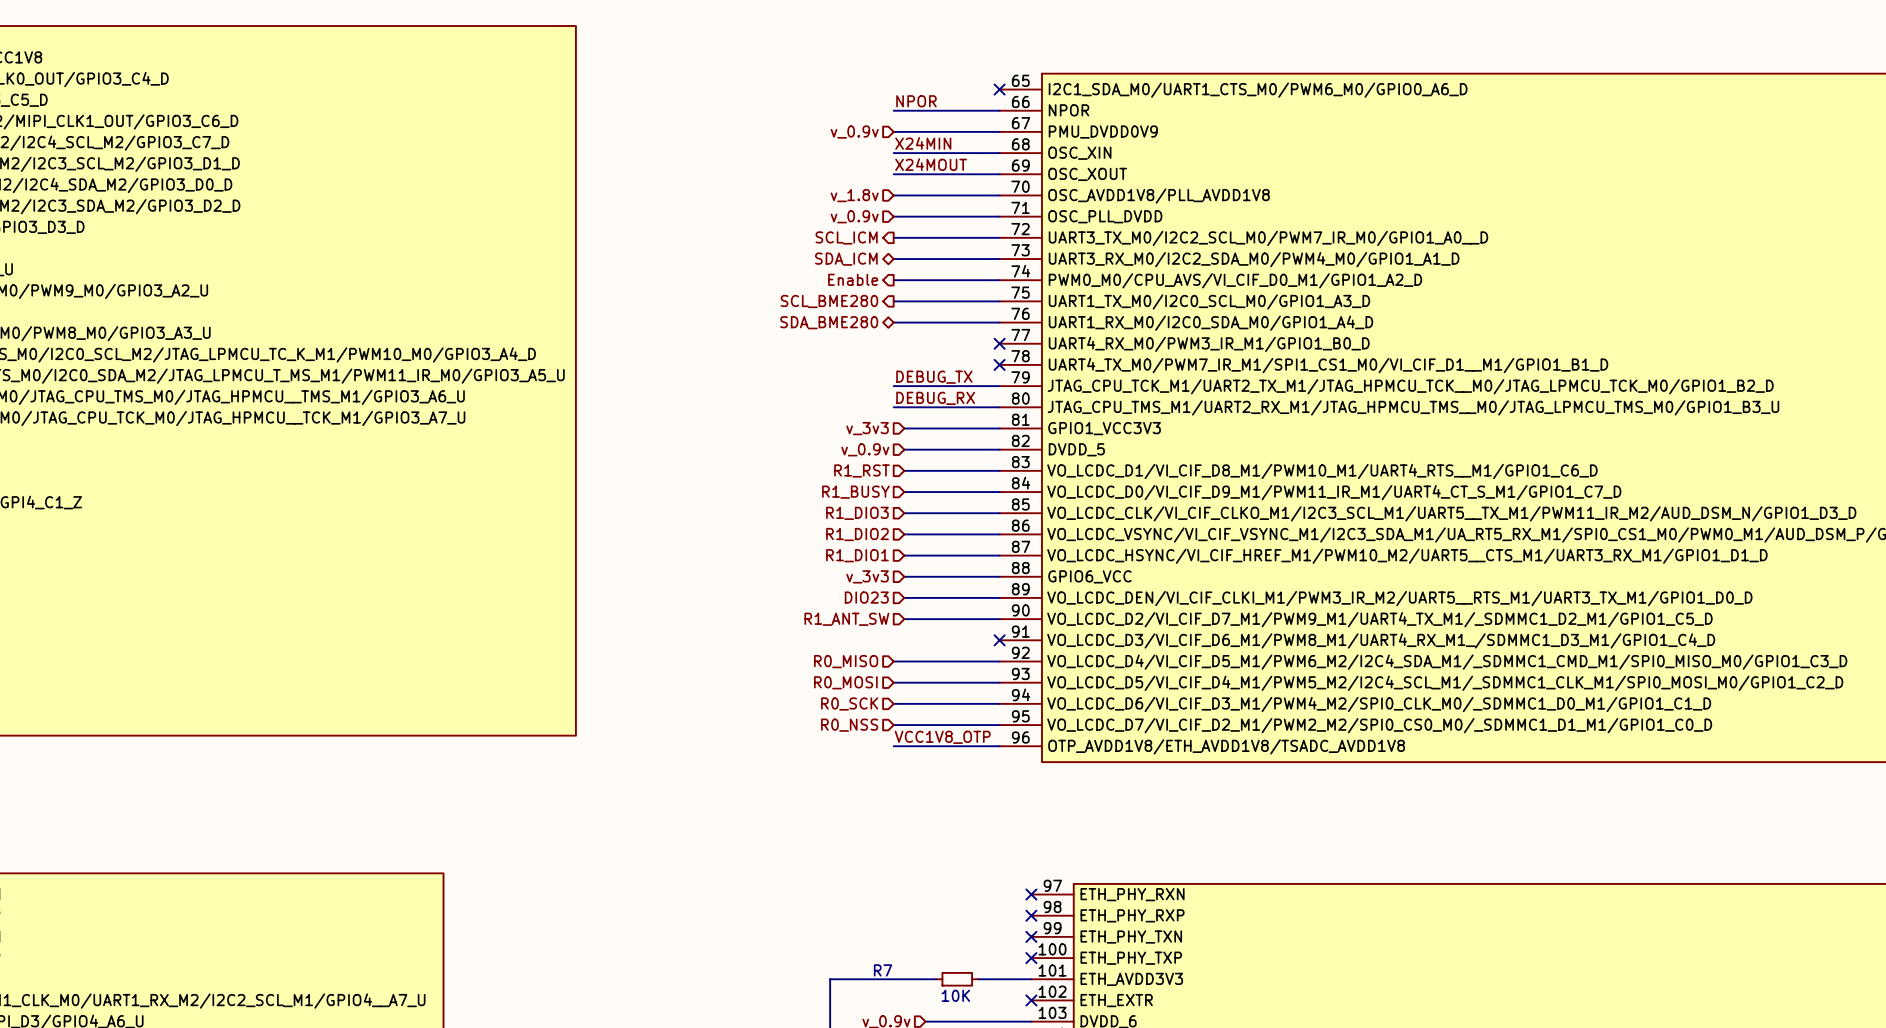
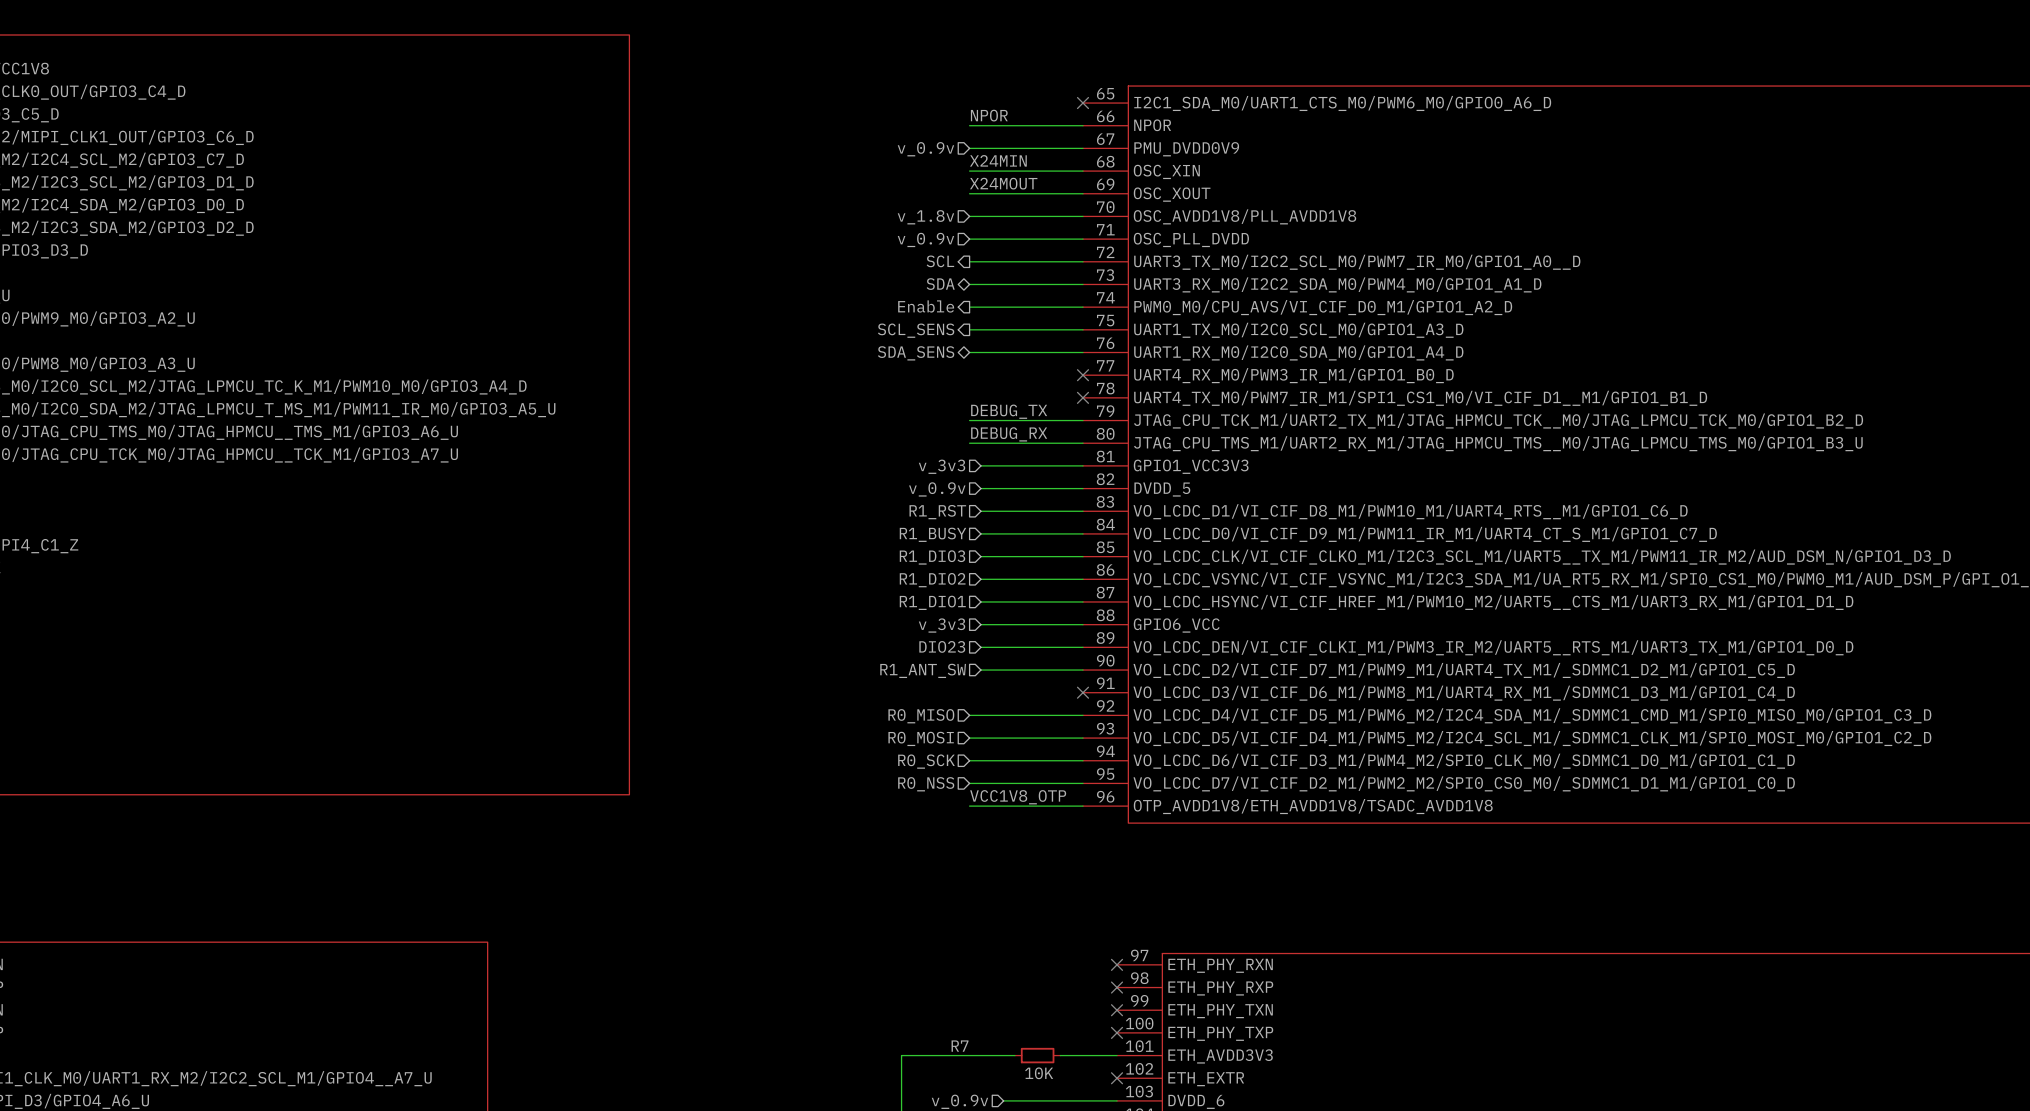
hierarchical label: SCL_ICM (846, 237) -> SCL (940, 261)
hierarchical label: SDA_ICM (846, 259) -> SDA (940, 284)
hierarchical label: SCL_BME280 (829, 301) -> SCL_SENS (916, 330)
hierarchical label: SDA_BME280 (829, 322) -> SDA_SENS (916, 353)

